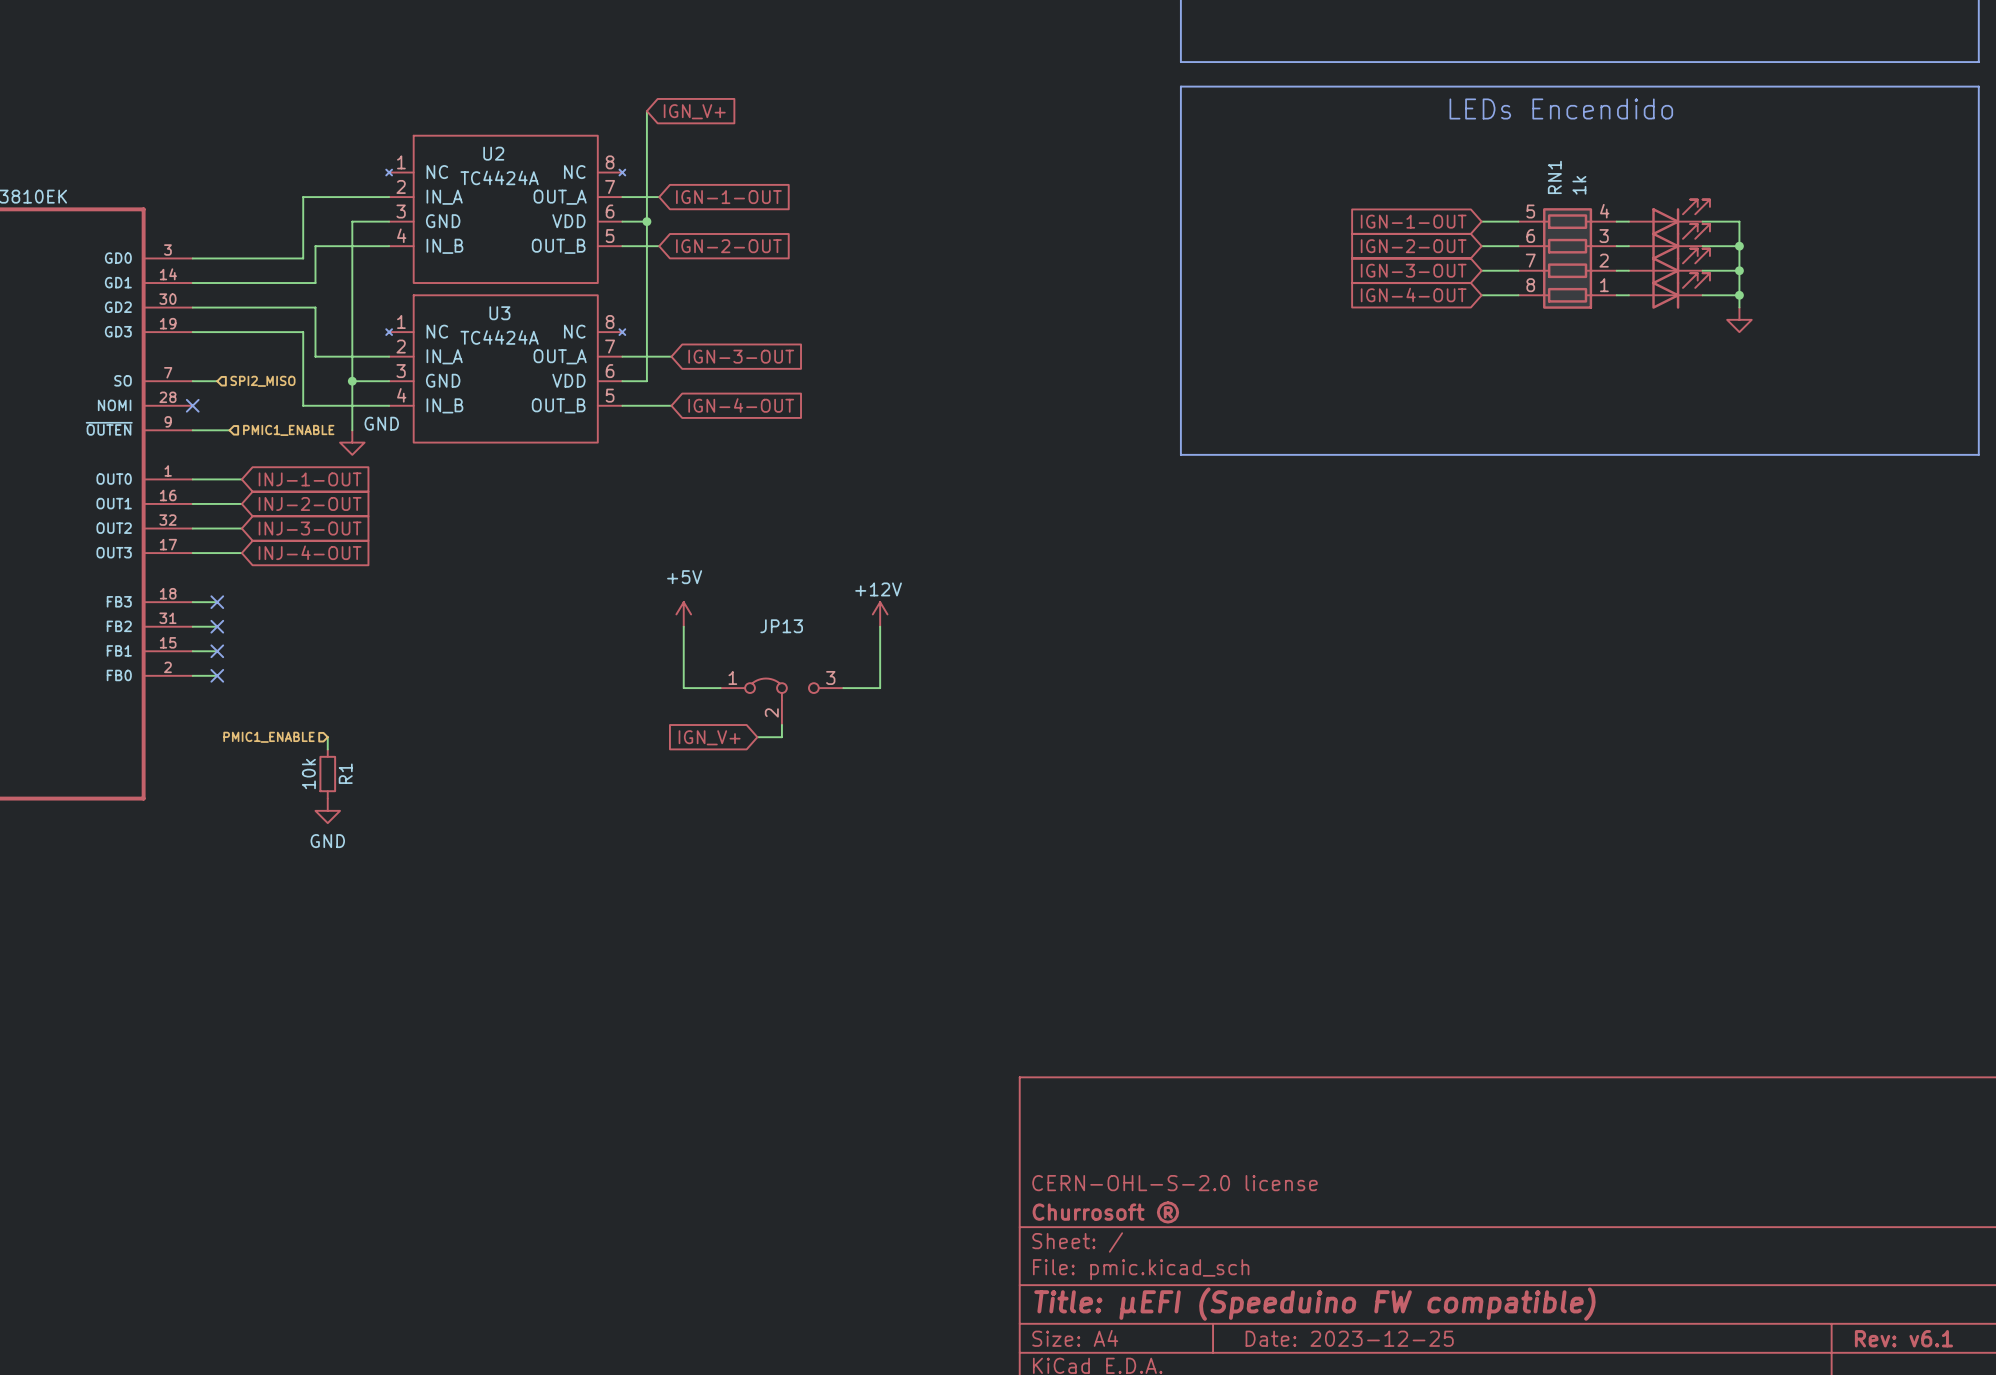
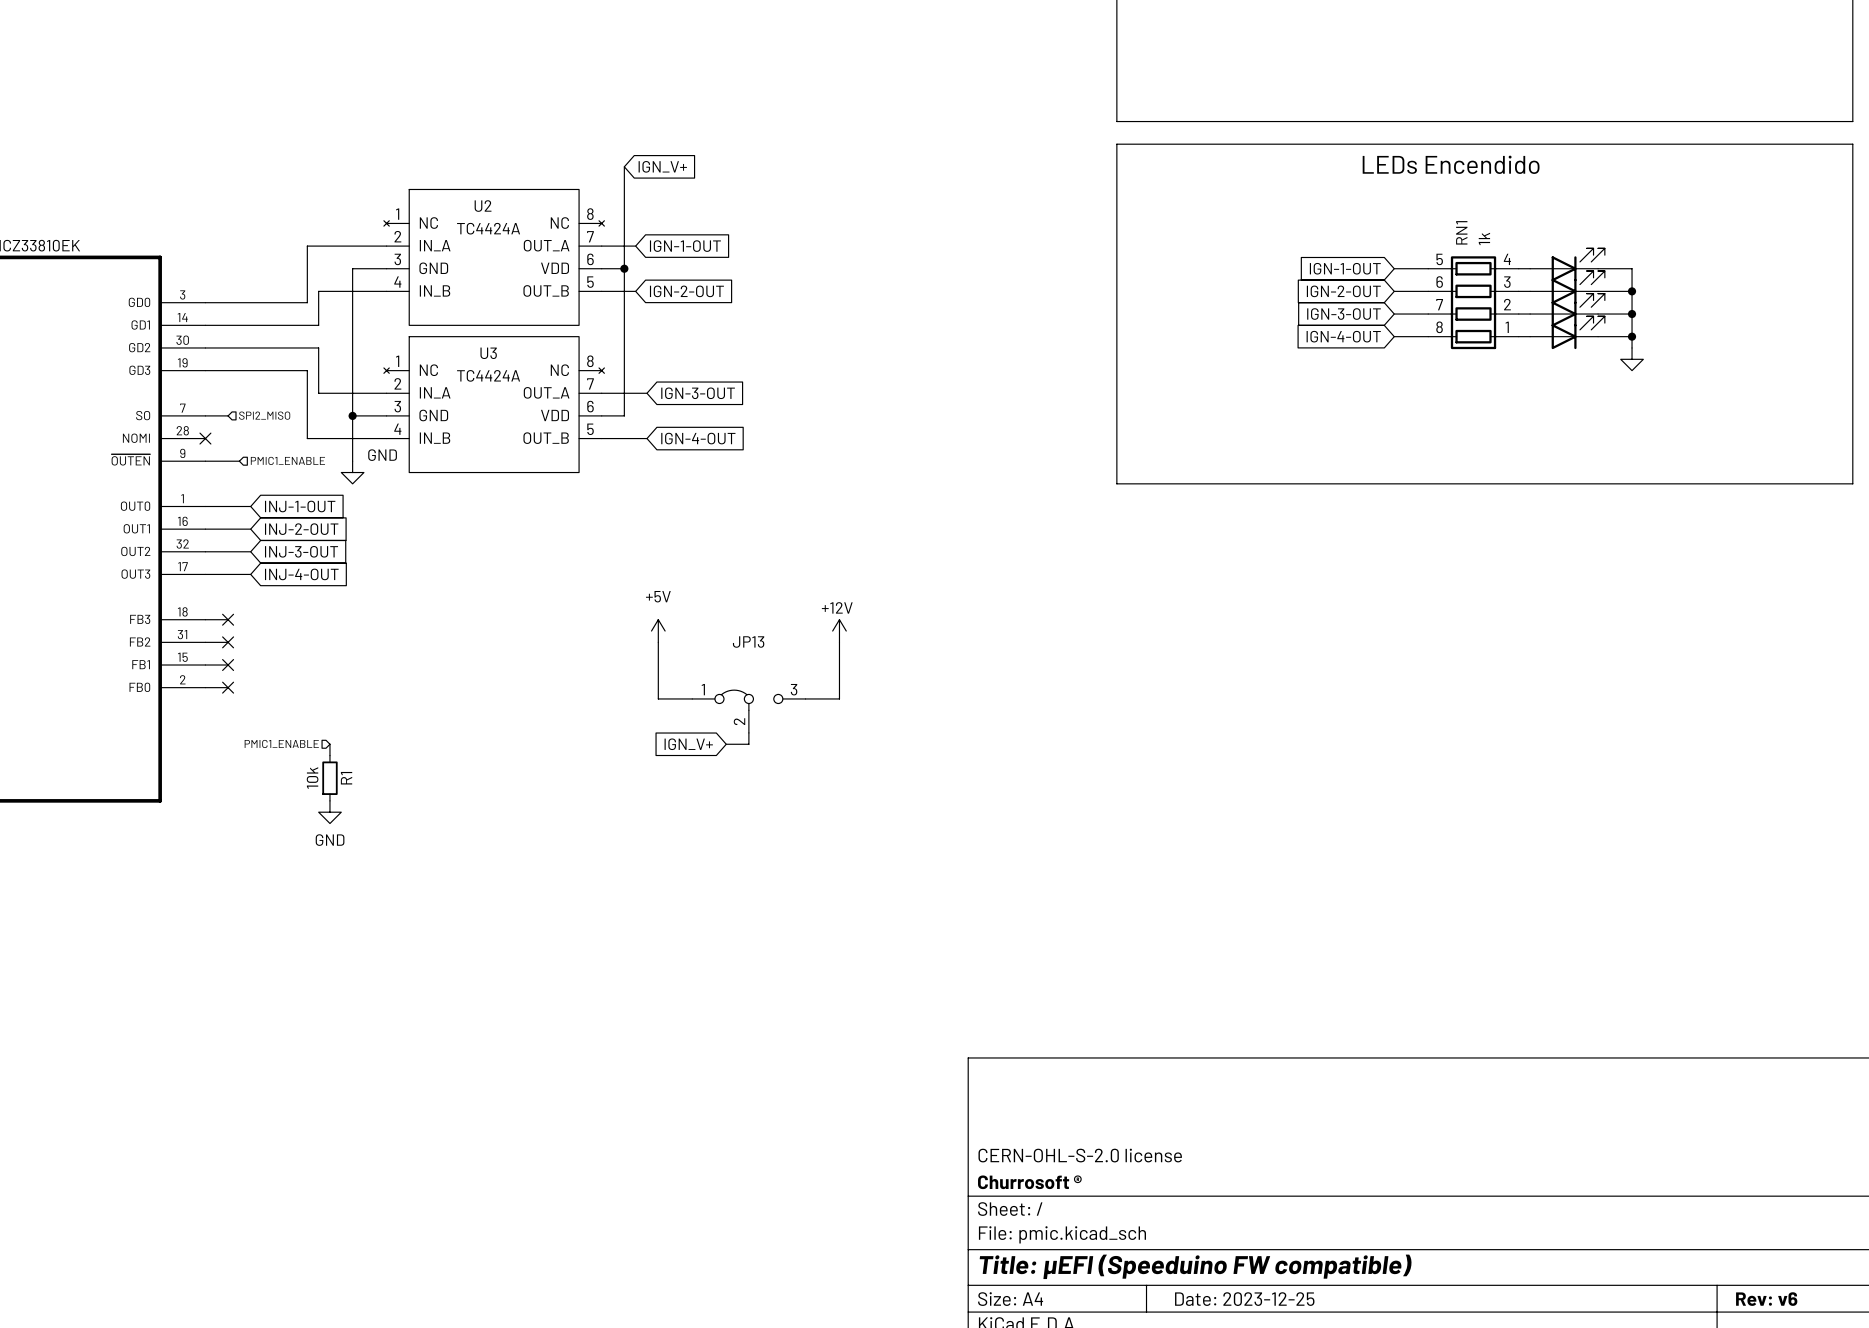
title block: Rev: v6.1 (1903, 1338) -> Rev: v6 (1766, 1299)

